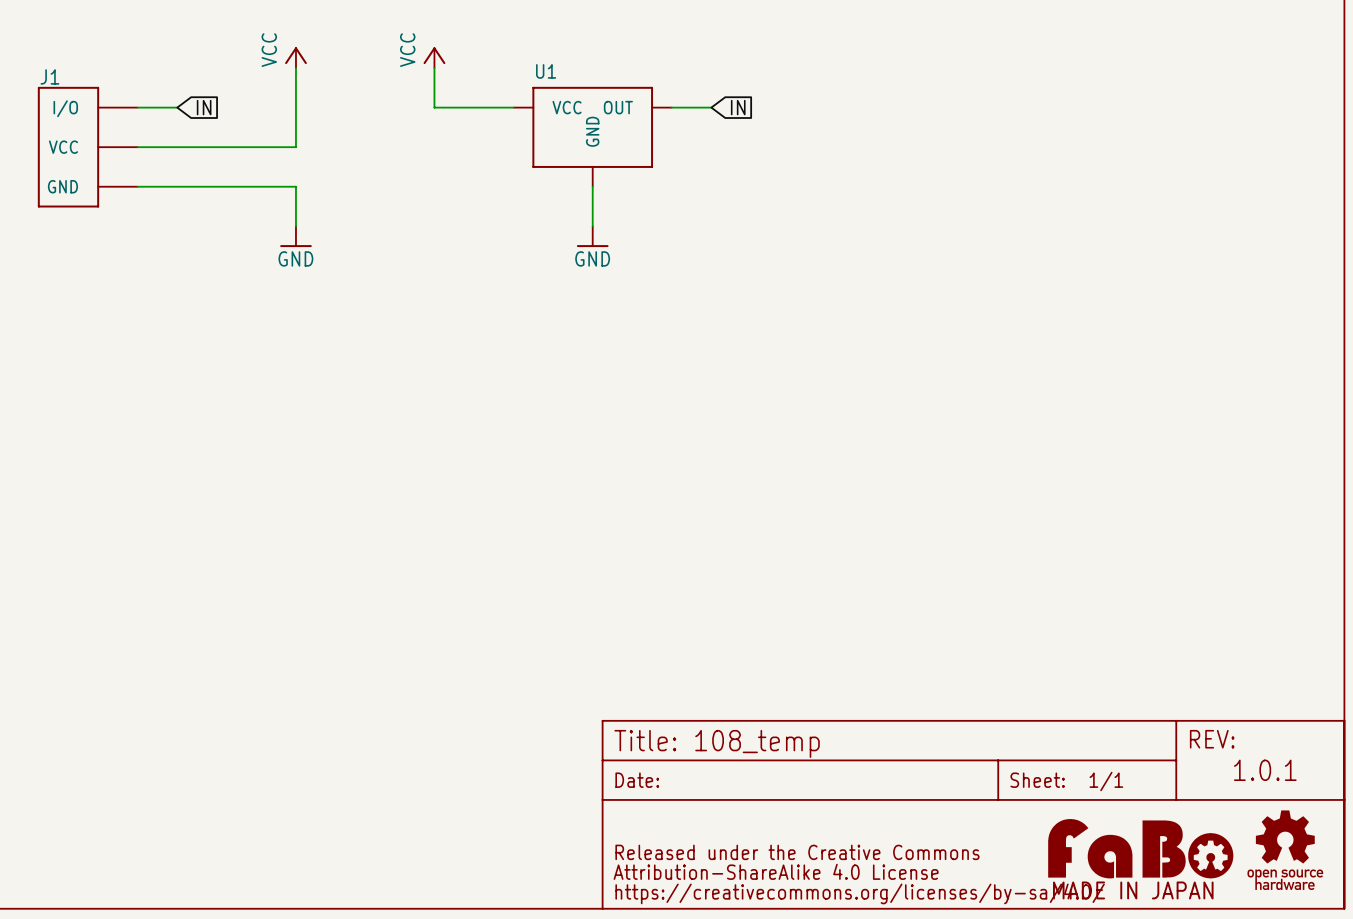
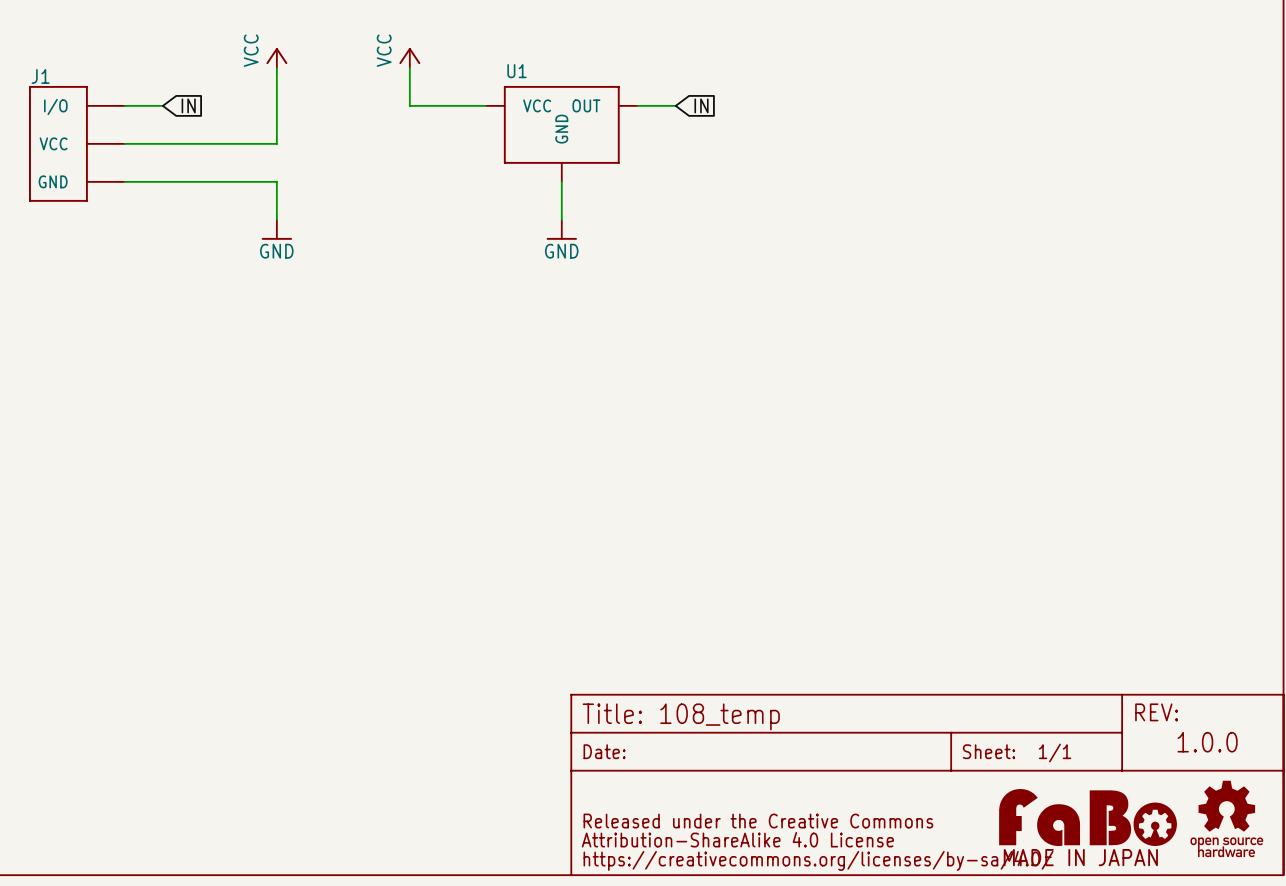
text: 1.0.1 (1265, 770) -> 1.0.0 (1207, 742)

